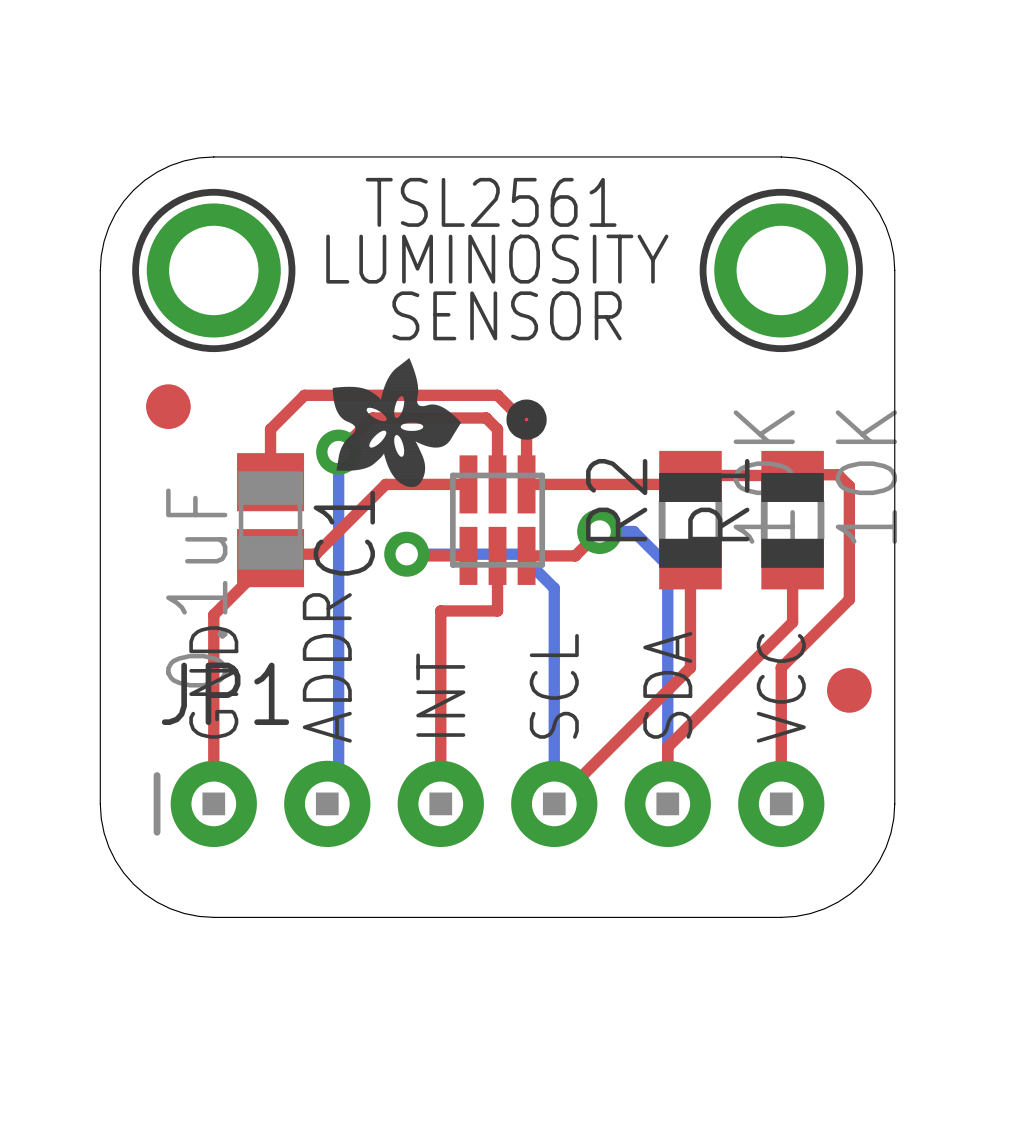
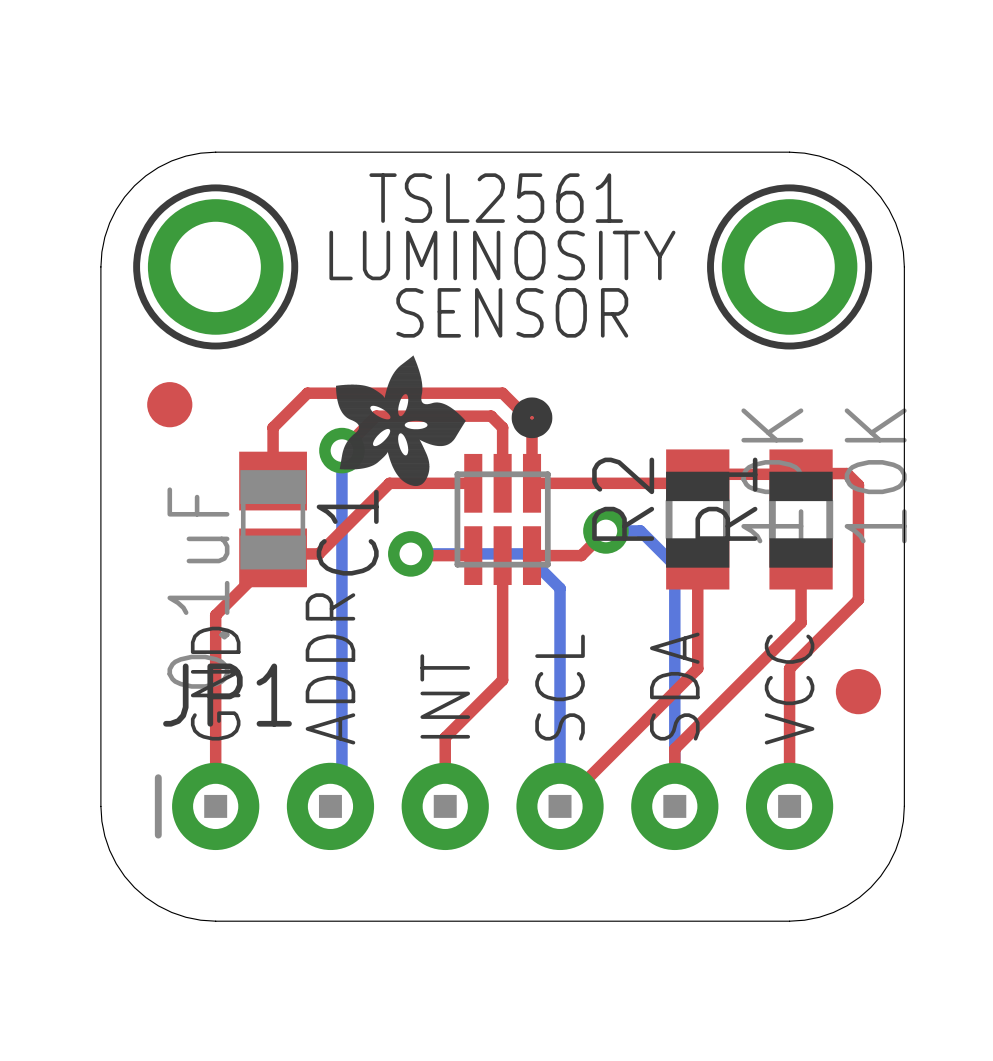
top track: (497, 610) (440, 610) (440, 735) -> (502, 611) (502, 680) (445, 737)

